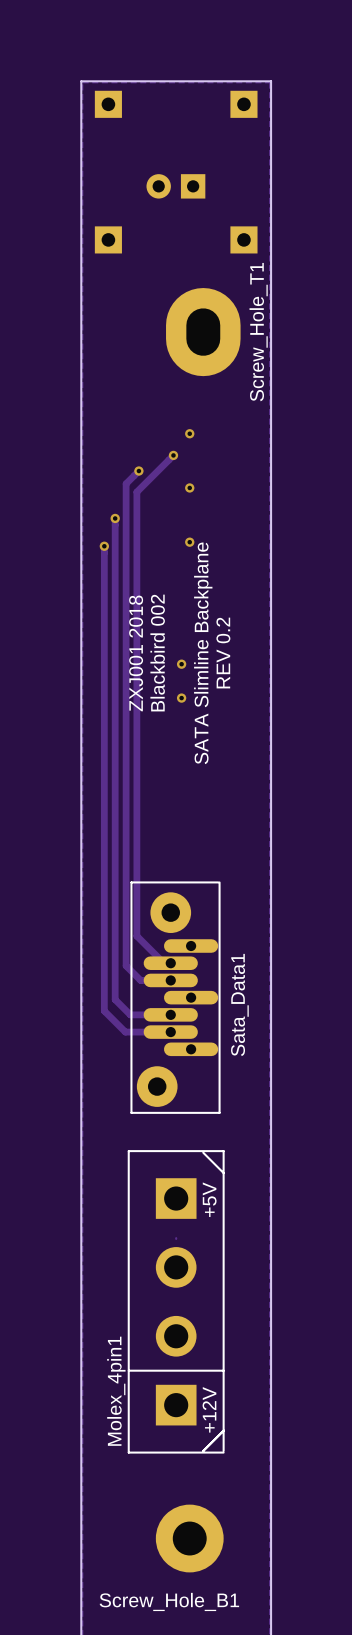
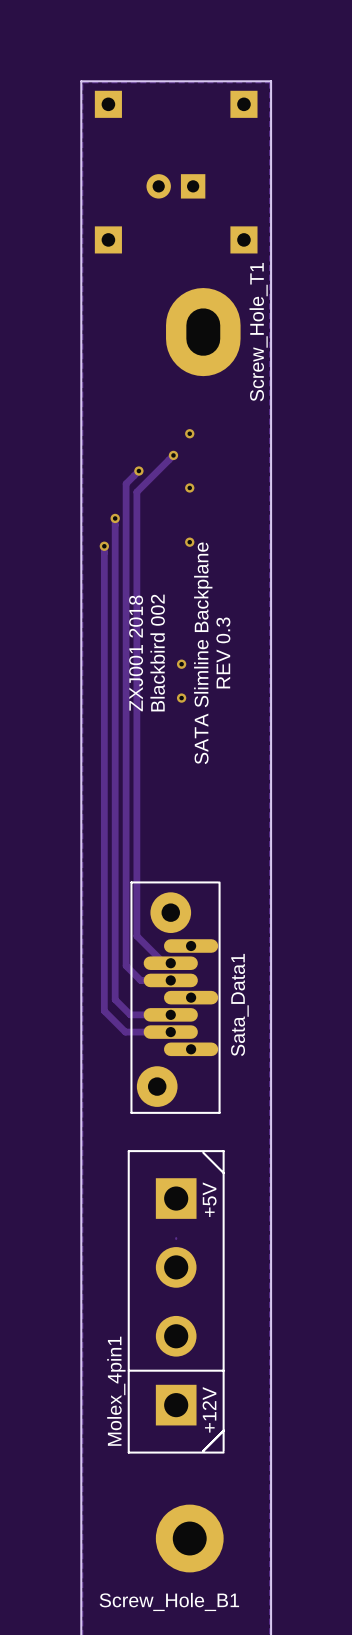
text: REV 0.2 (223, 653) -> REV 0.3 (223, 652)

